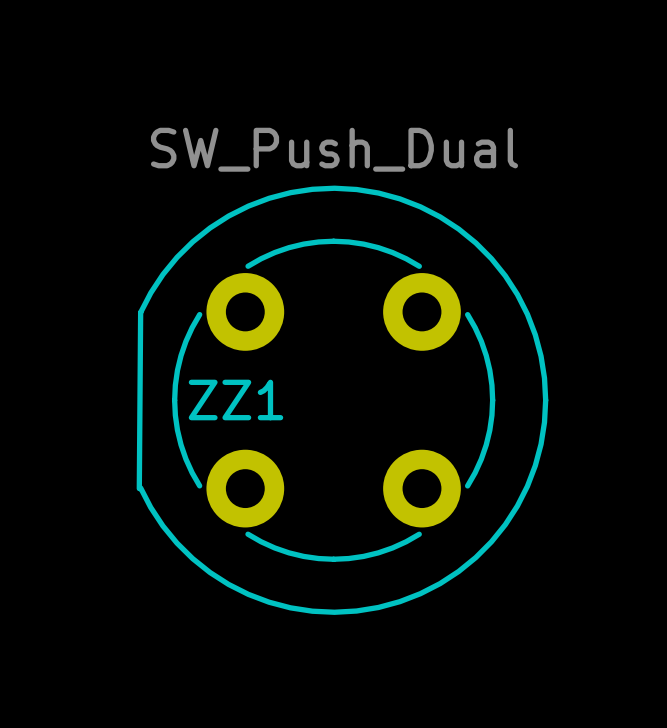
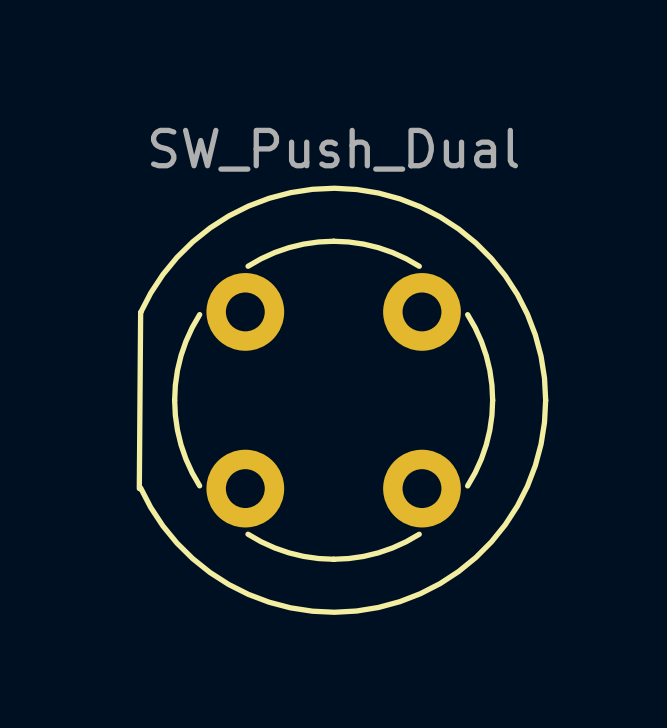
ZZ1 name: ZZ1 (235, 399) -> none

